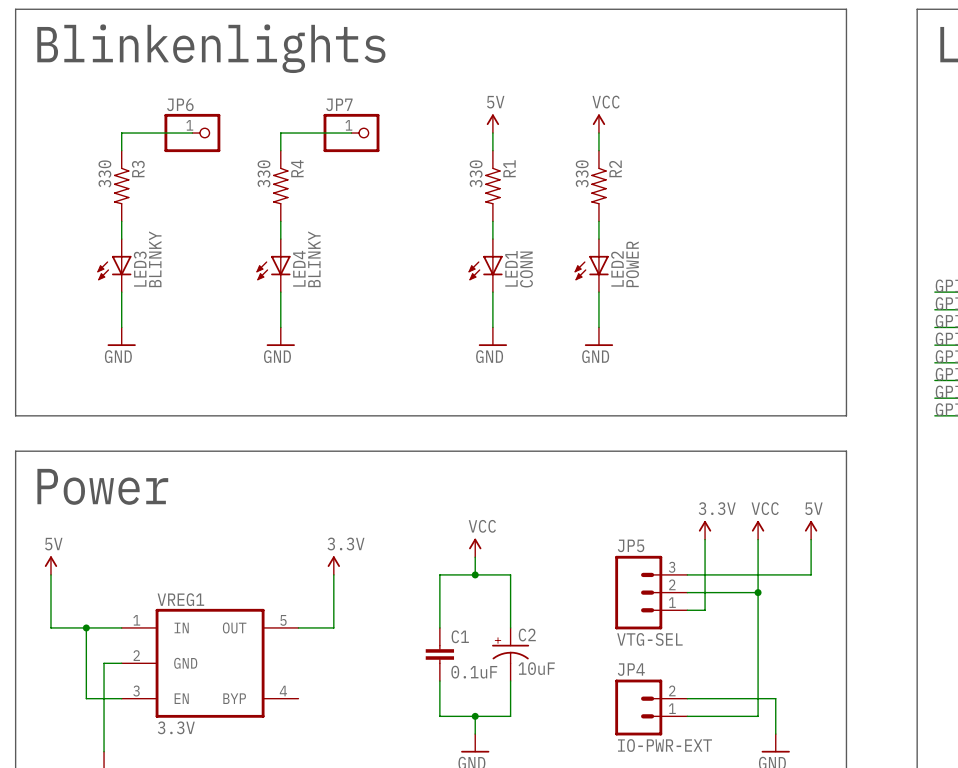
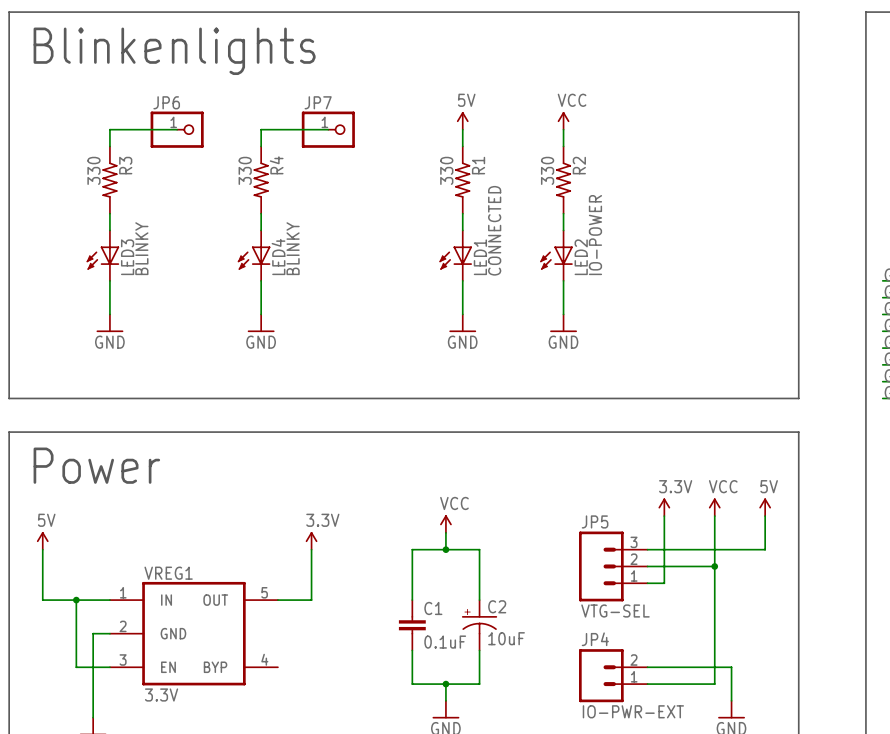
LED2 value: POWER (632, 264) -> IO-POWER (595, 235)
LED1 value: CONN (526, 269) -> CONNECTED (494, 230)

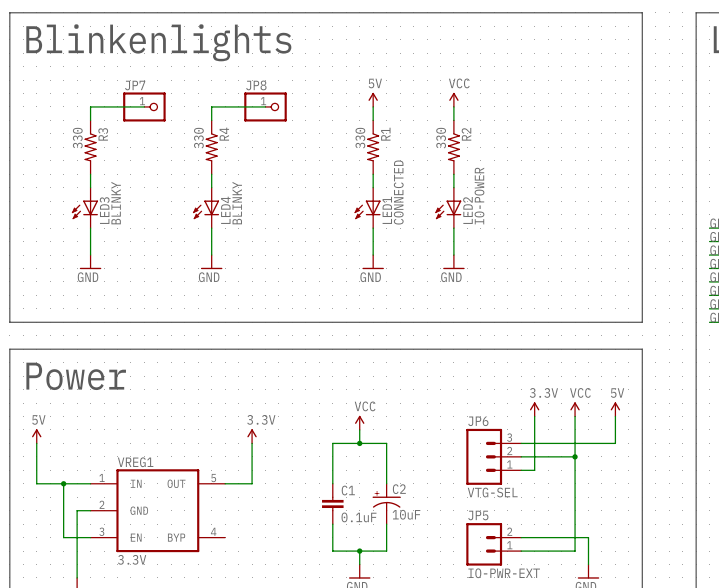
JP6 name: JP6 (166, 102) -> JP7 (135, 85)
JP7 name: JP7 (318, 102) -> JP8 (256, 85)
JP5 name: JP5 (595, 521) -> JP6 (478, 421)
JP4 name: JP4 (595, 639) -> JP5 (478, 515)

